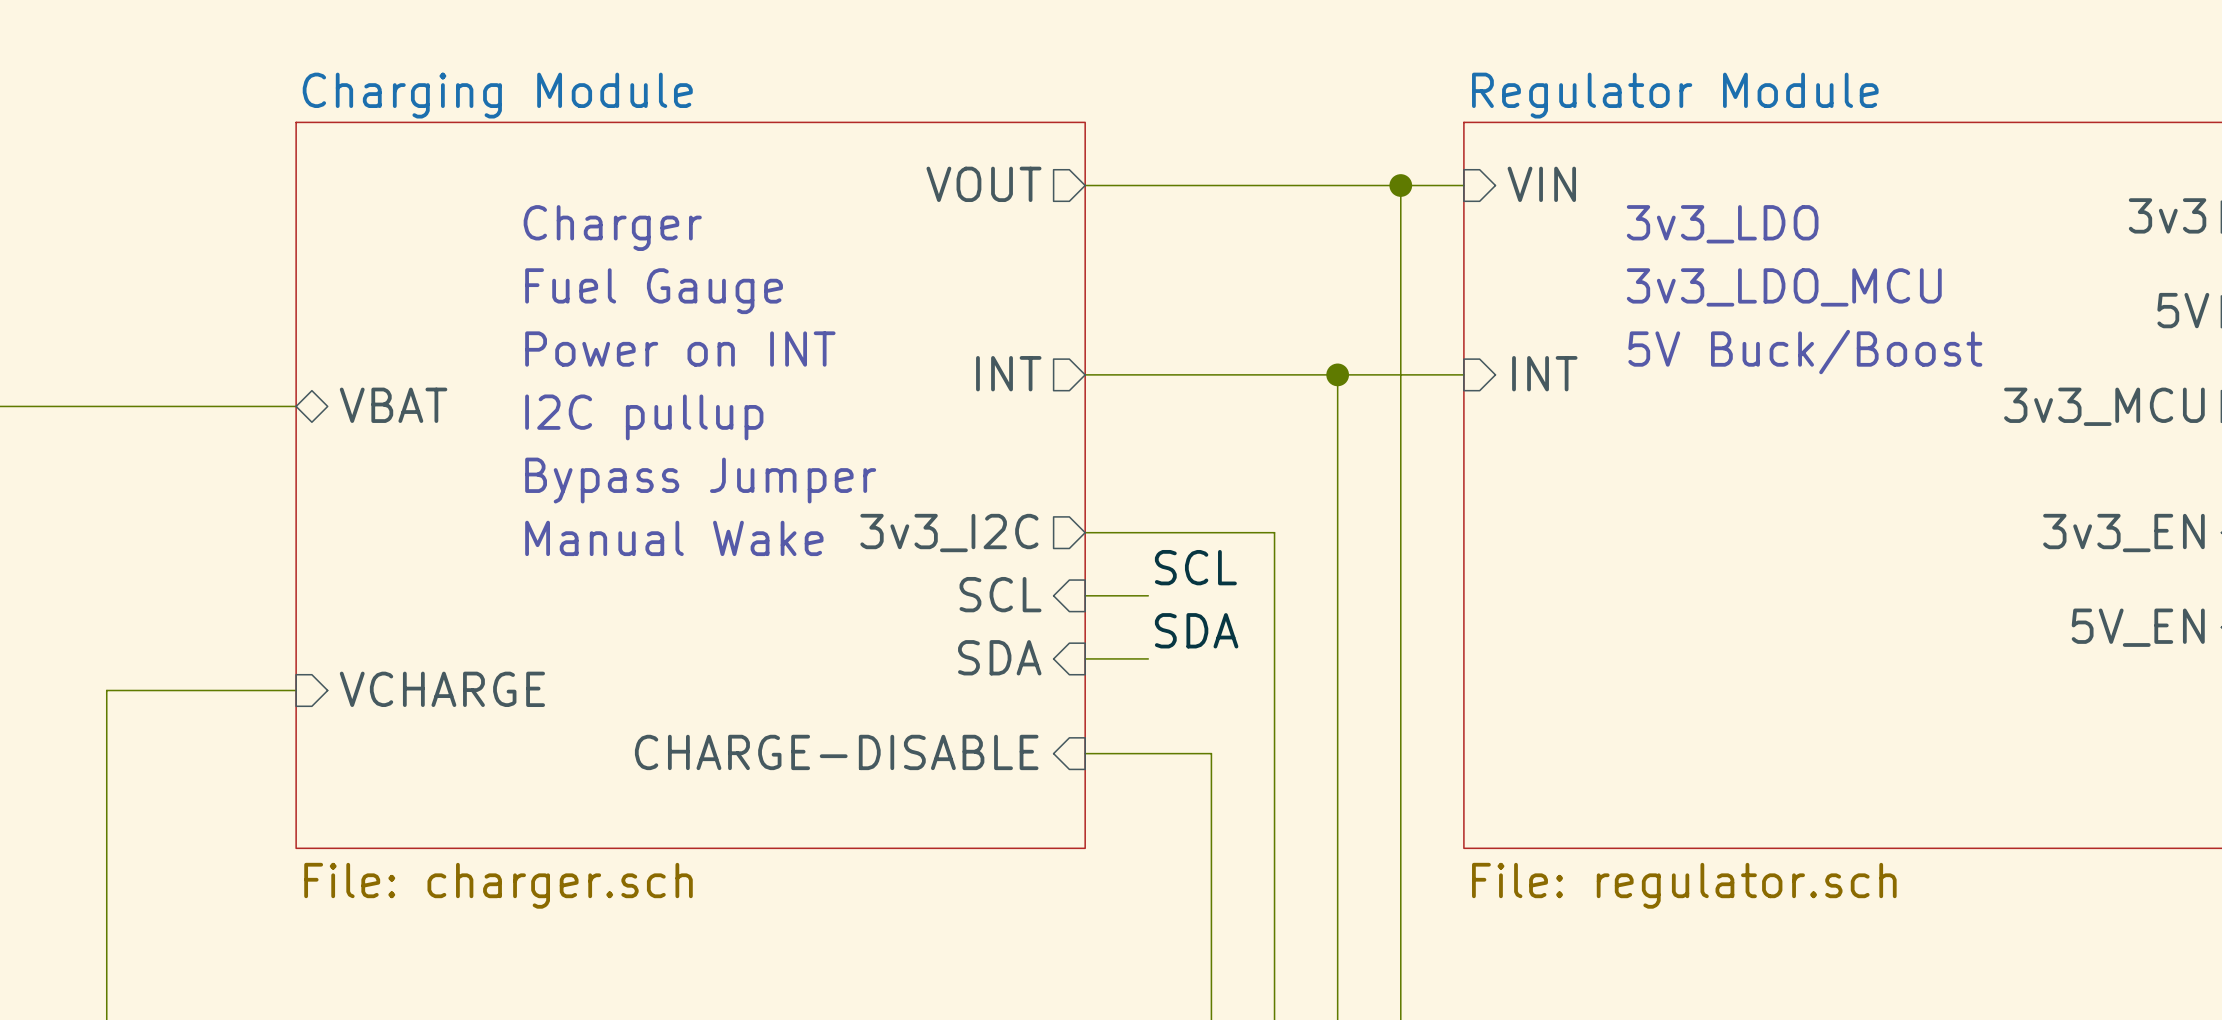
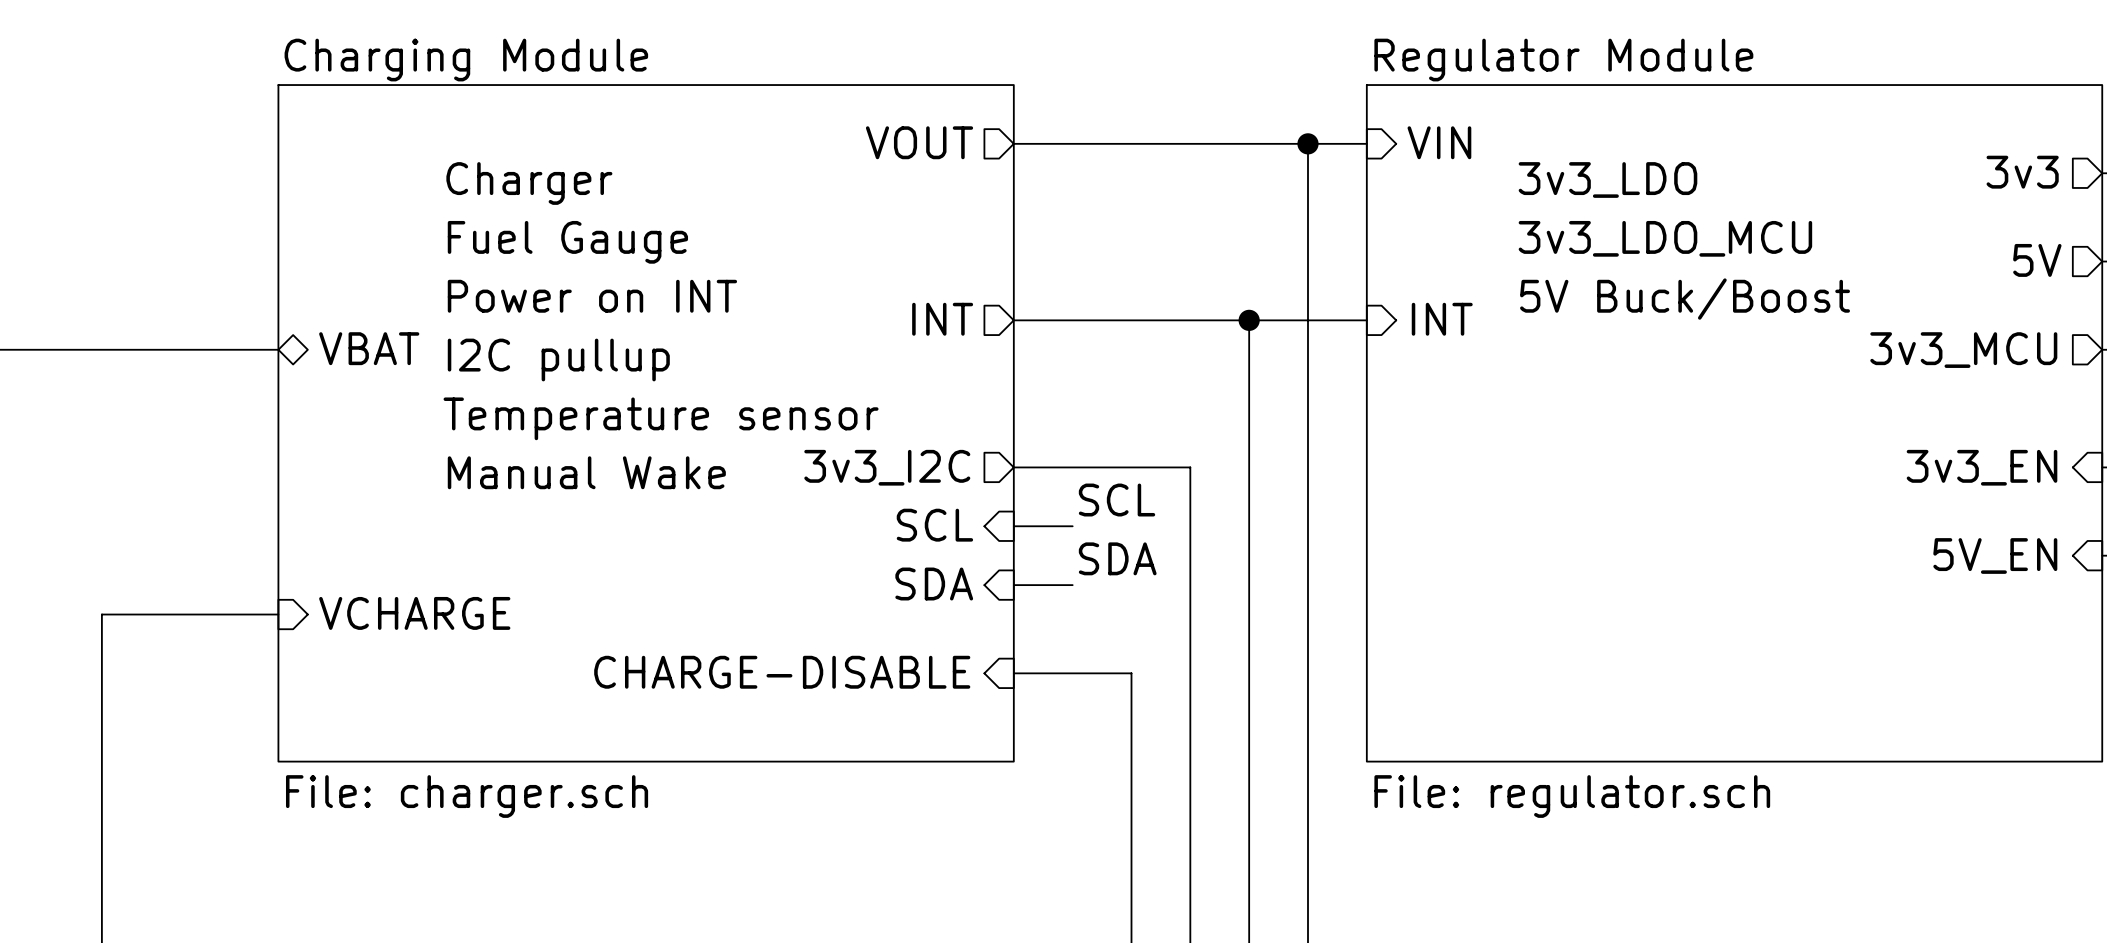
text position: Charger (612, 228) -> Charger (529, 183)
text position: Fuel Gauge (654, 291) -> Fuel Gauge (567, 242)
text position: Power on INT (680, 349) -> Power on INT (592, 296)
text position: I2C pullup (644, 417) -> I2C pullup (558, 359)
text: Bypass Jumper (700, 480) -> none
text: none -> Temperature sensor (661, 418)
text position: Manual Wake (674, 538) -> Manual Wake (586, 472)

